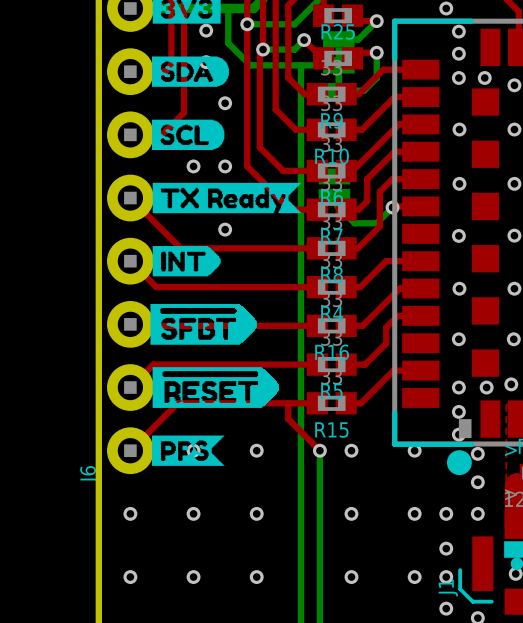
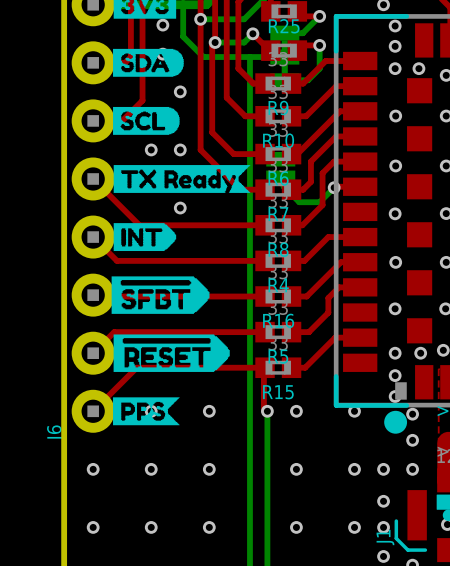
top track: (288, 403) (288, 419) (319, 450) -> none
top track: none -> (265, 367) (263, 410)

